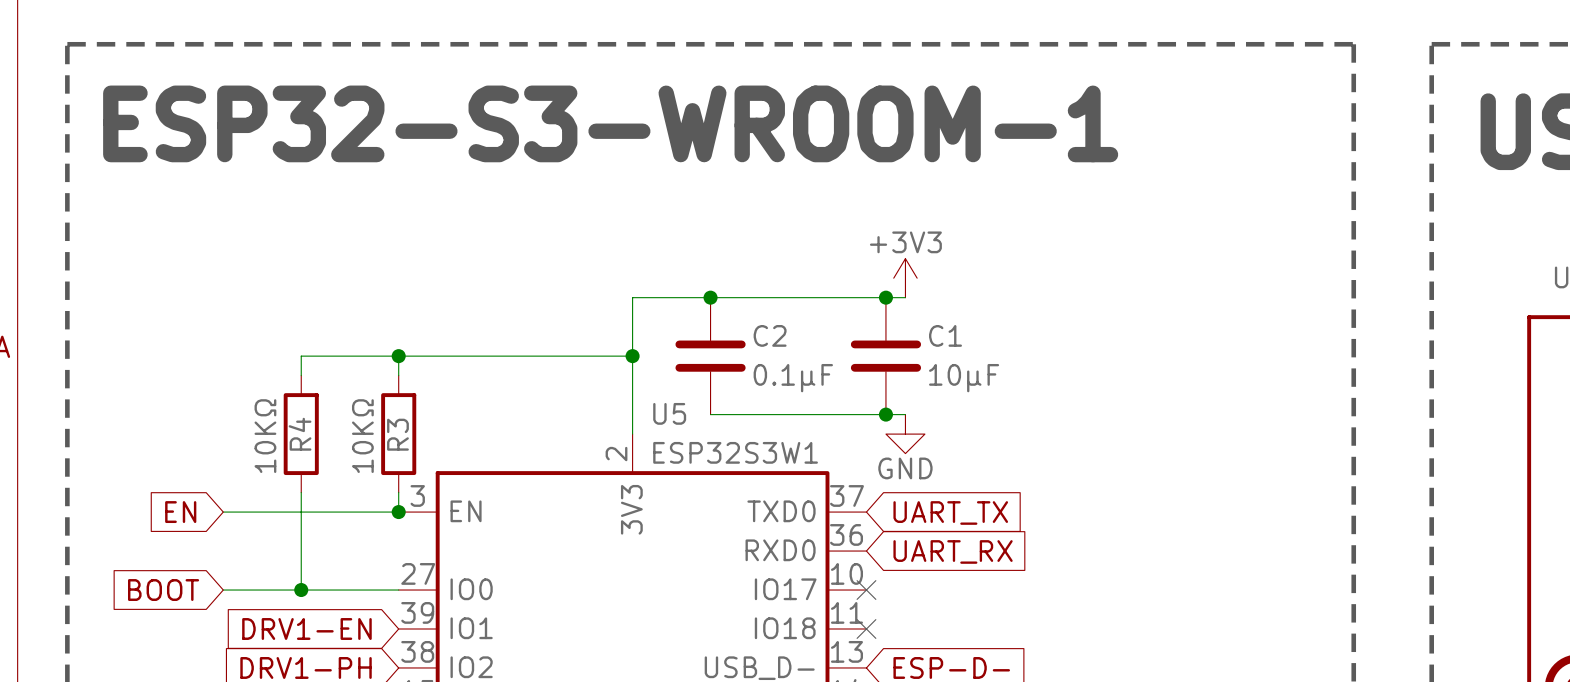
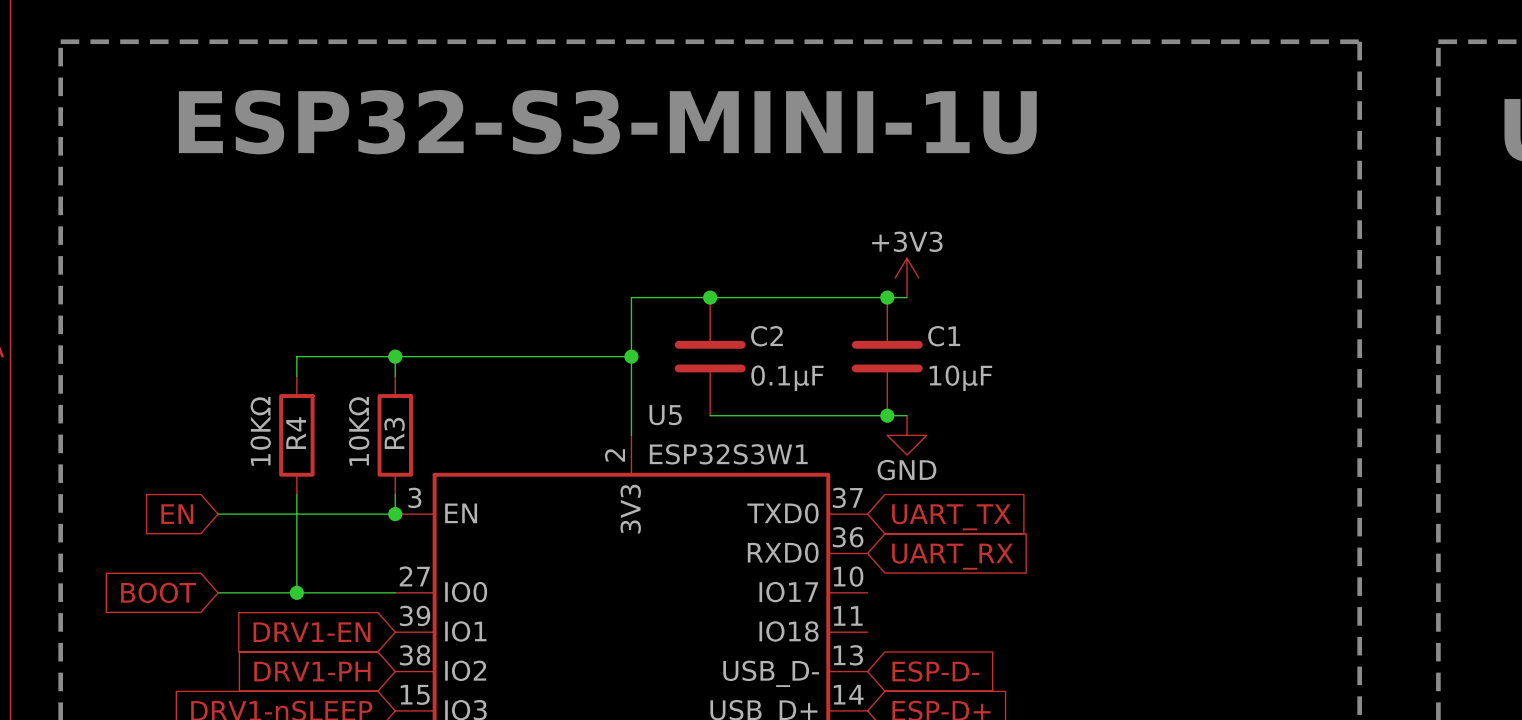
text: ESP32-S3-WROOM-1 (610, 123) -> ESP32-S3-MINI-1U (607, 122)
no-connect mark: (866, 590) -> none
no-connect mark: (866, 628) -> none

